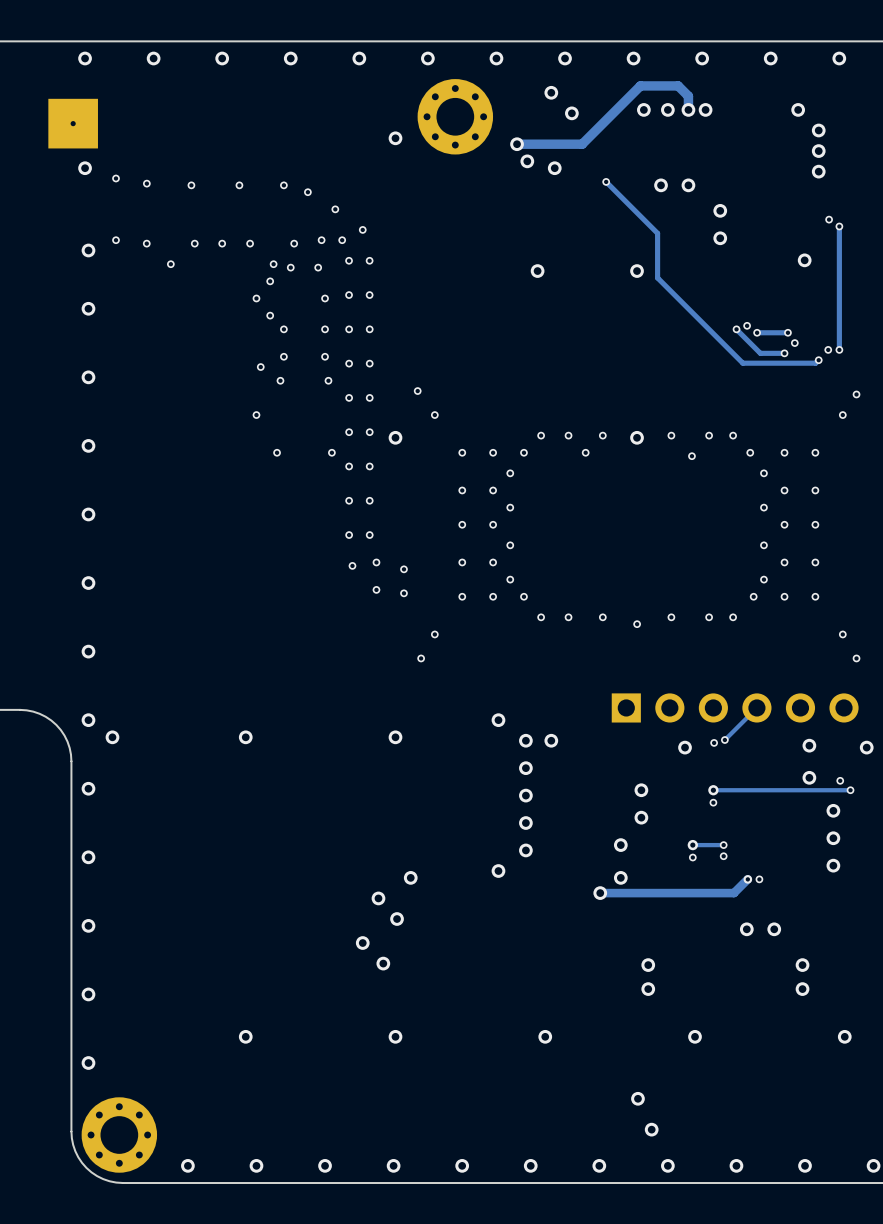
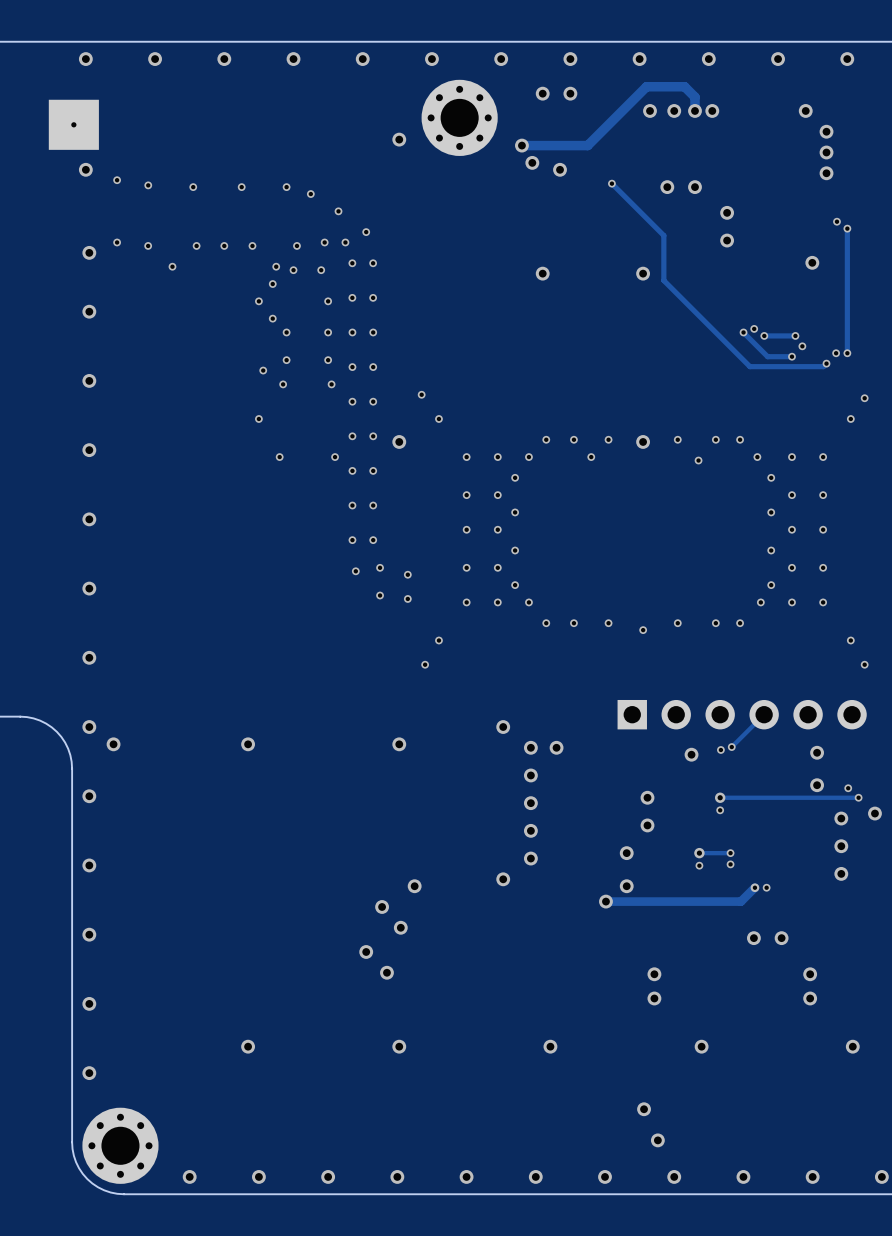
via: none -> (542, 93)
via: (551, 92) -> none
via: none -> (570, 93)
via: (571, 113) -> none
via position: (866, 747) -> (874, 813)

